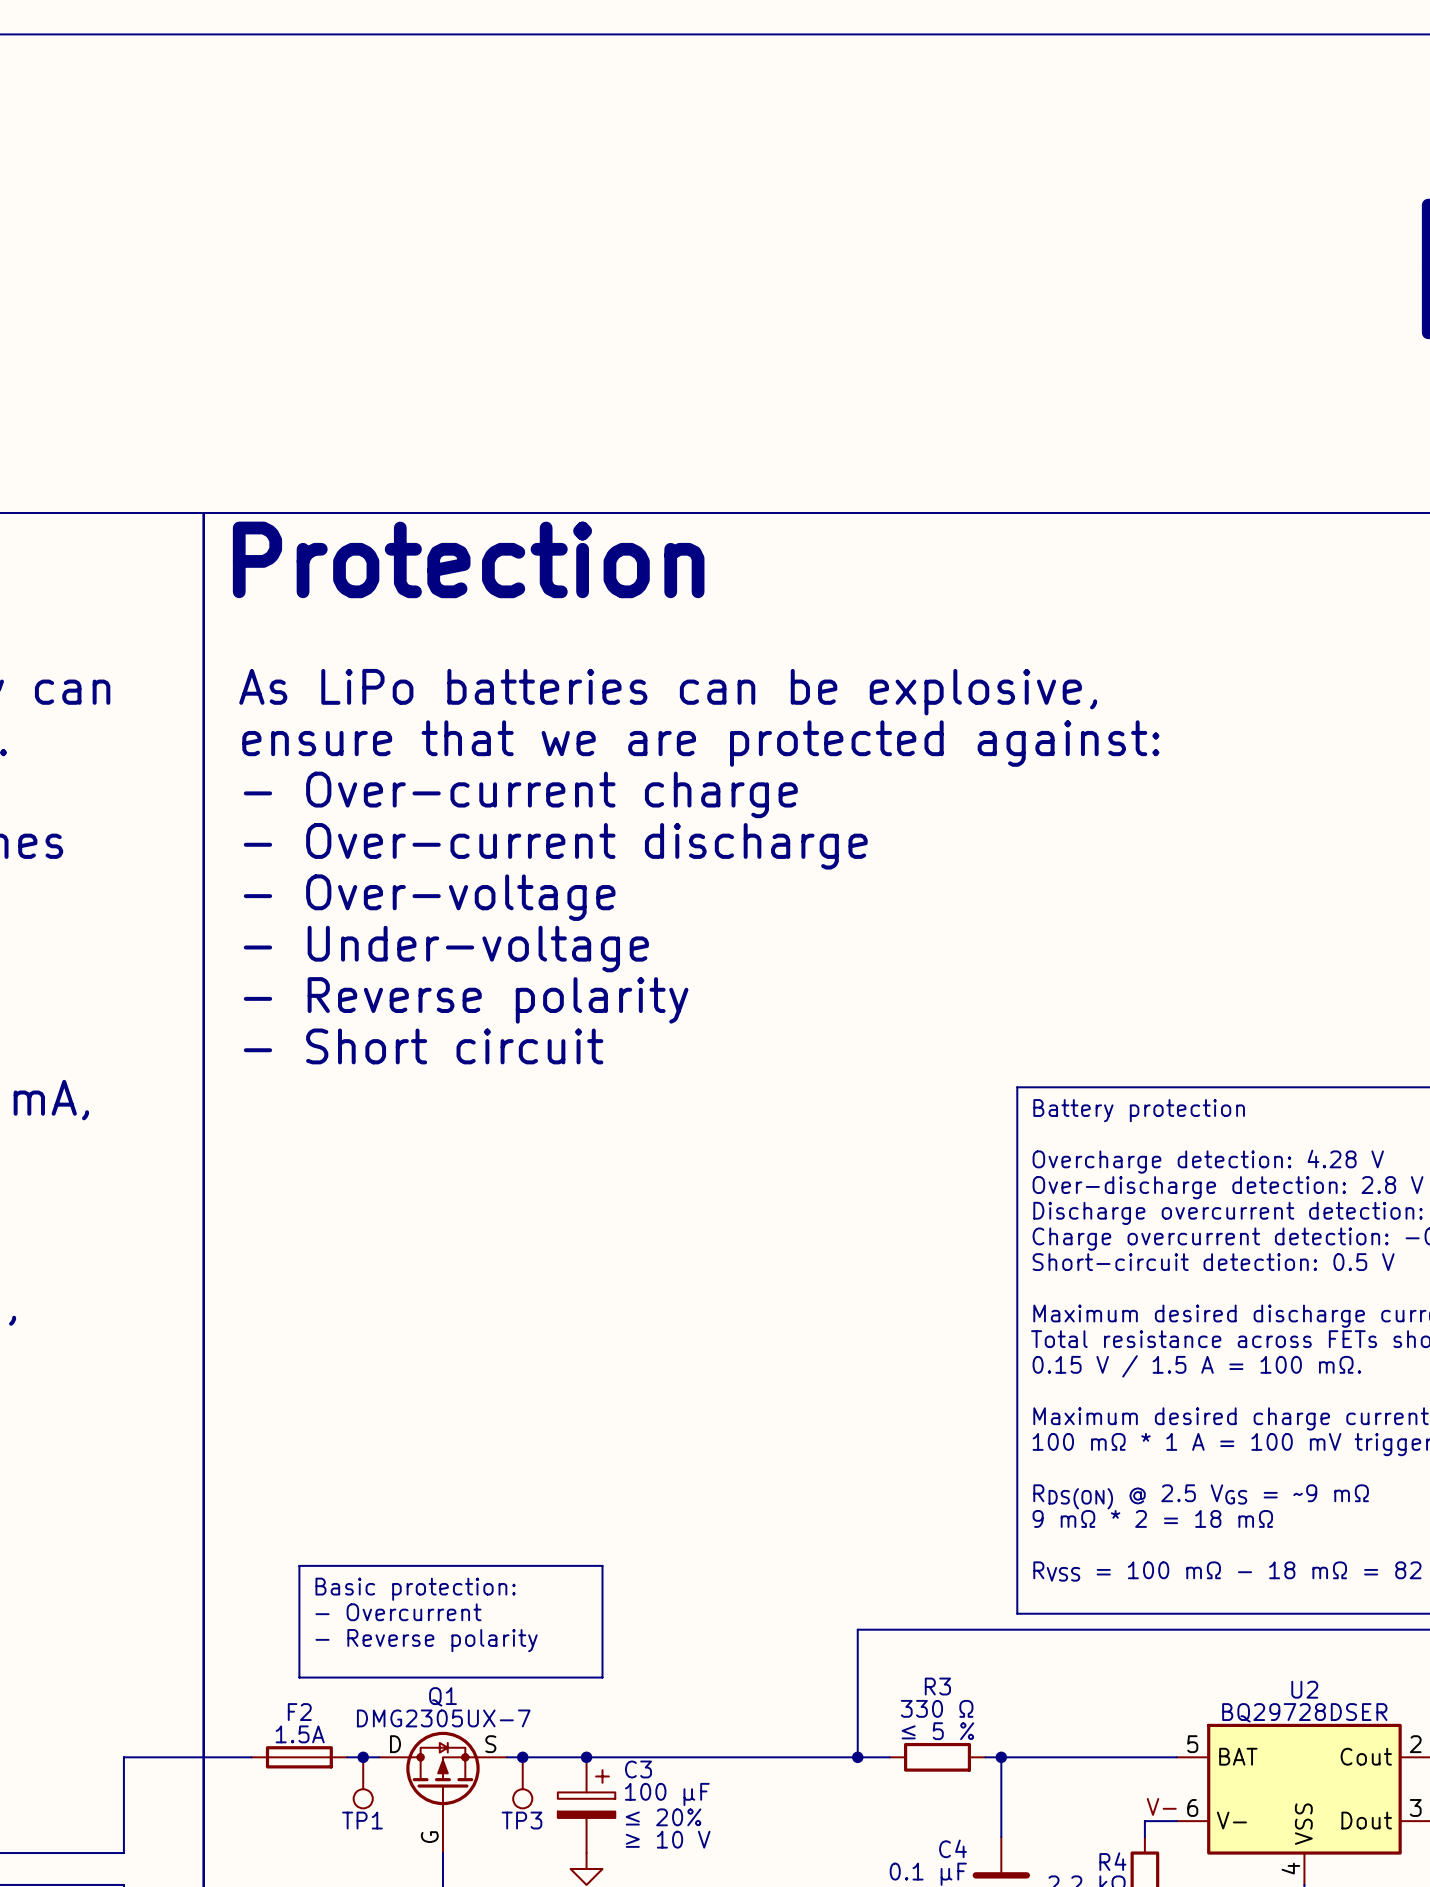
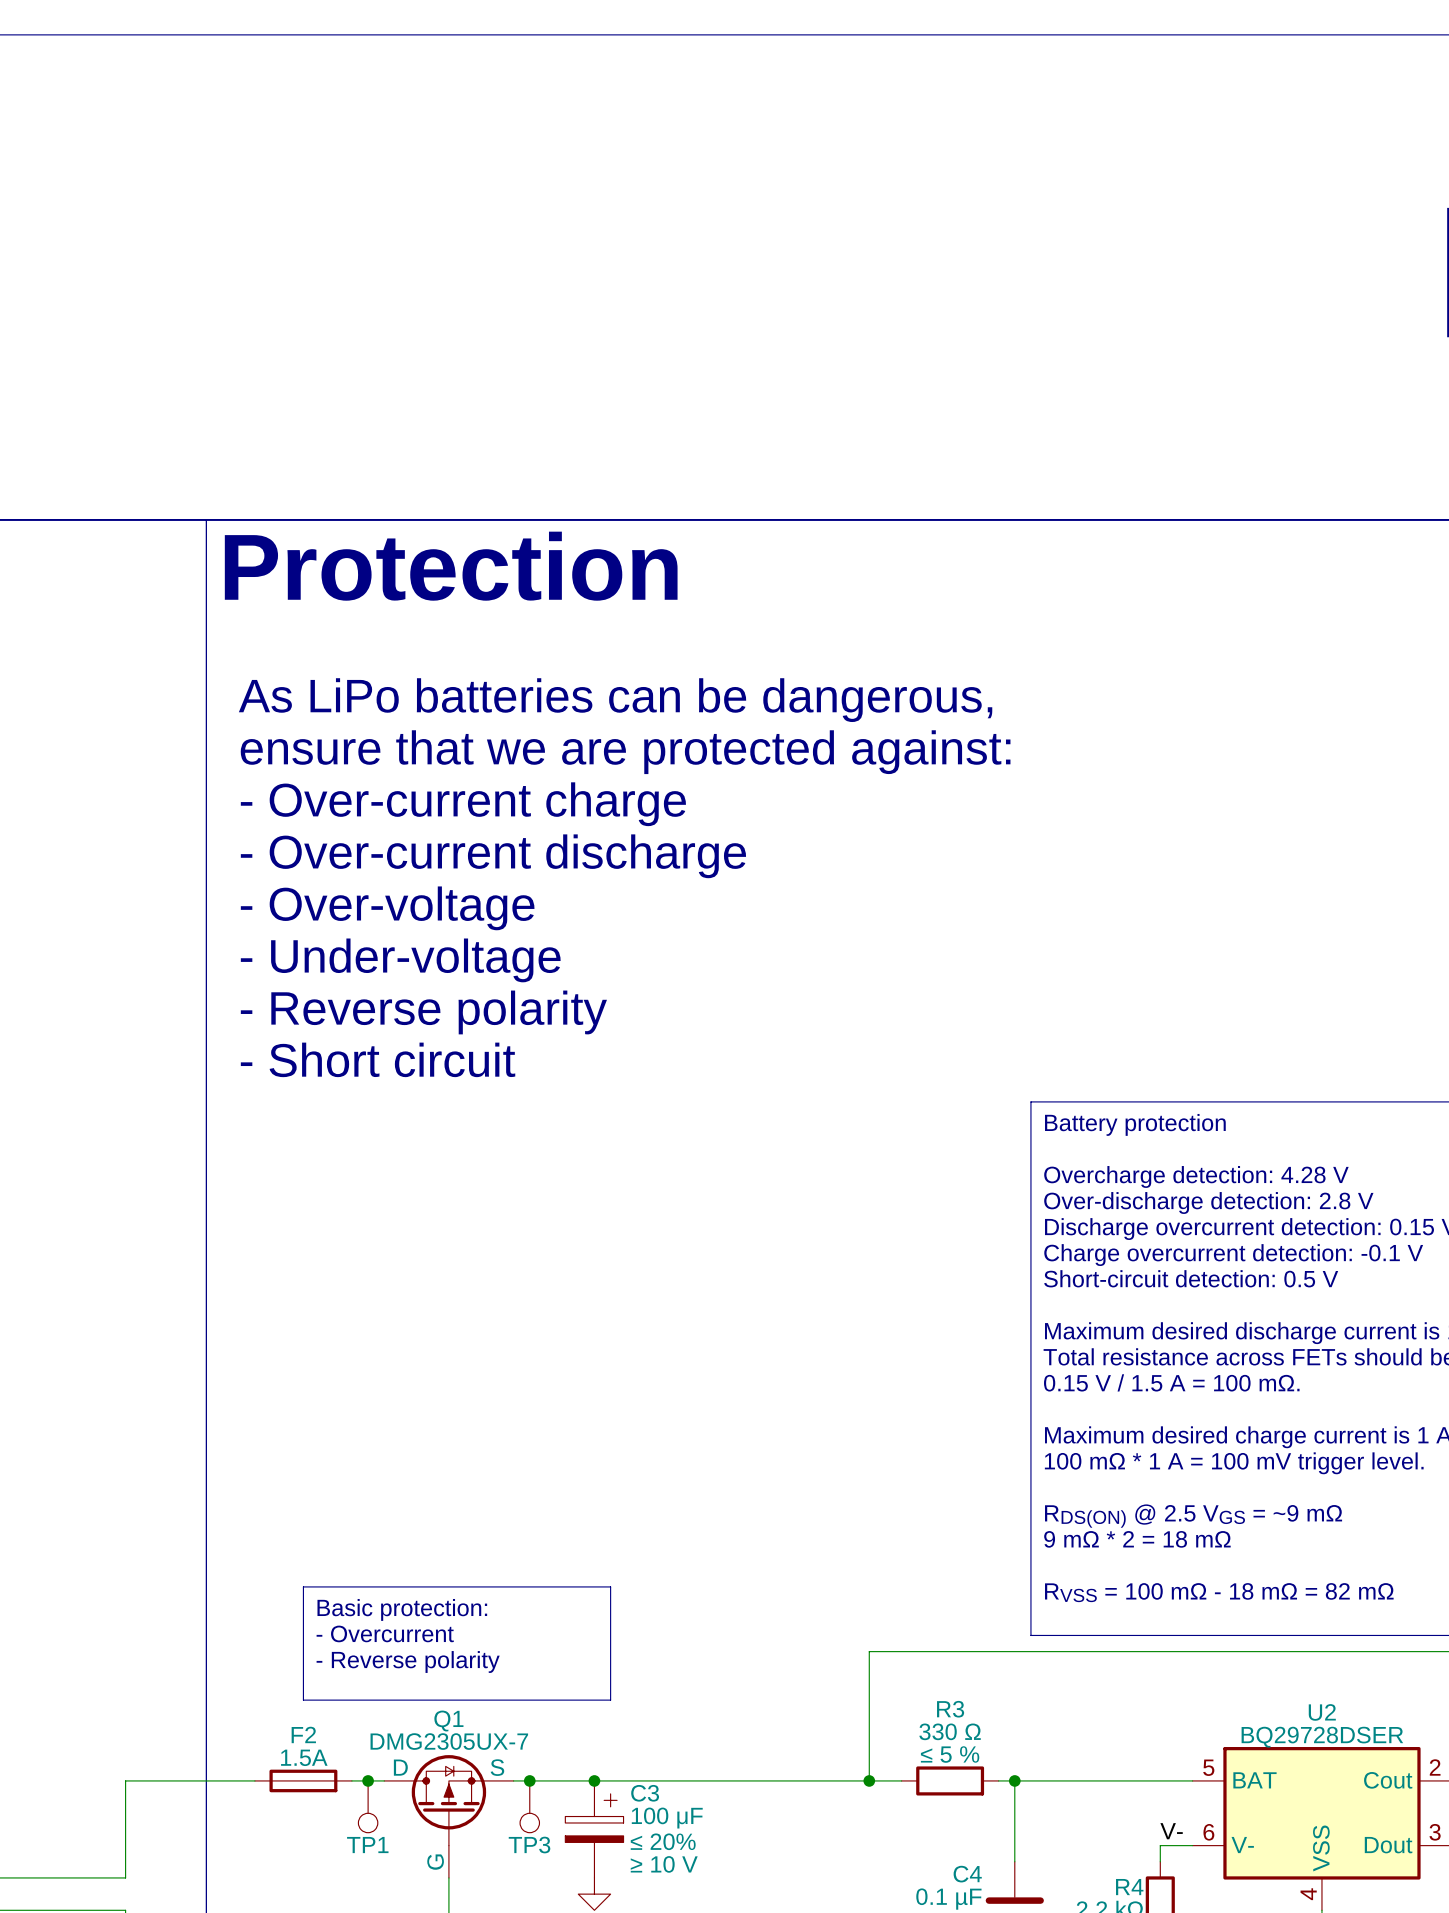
text: As LiPo batteries can be explosive, (668, 692) -> As LiPo batteries can be dangerous, (615, 700)

